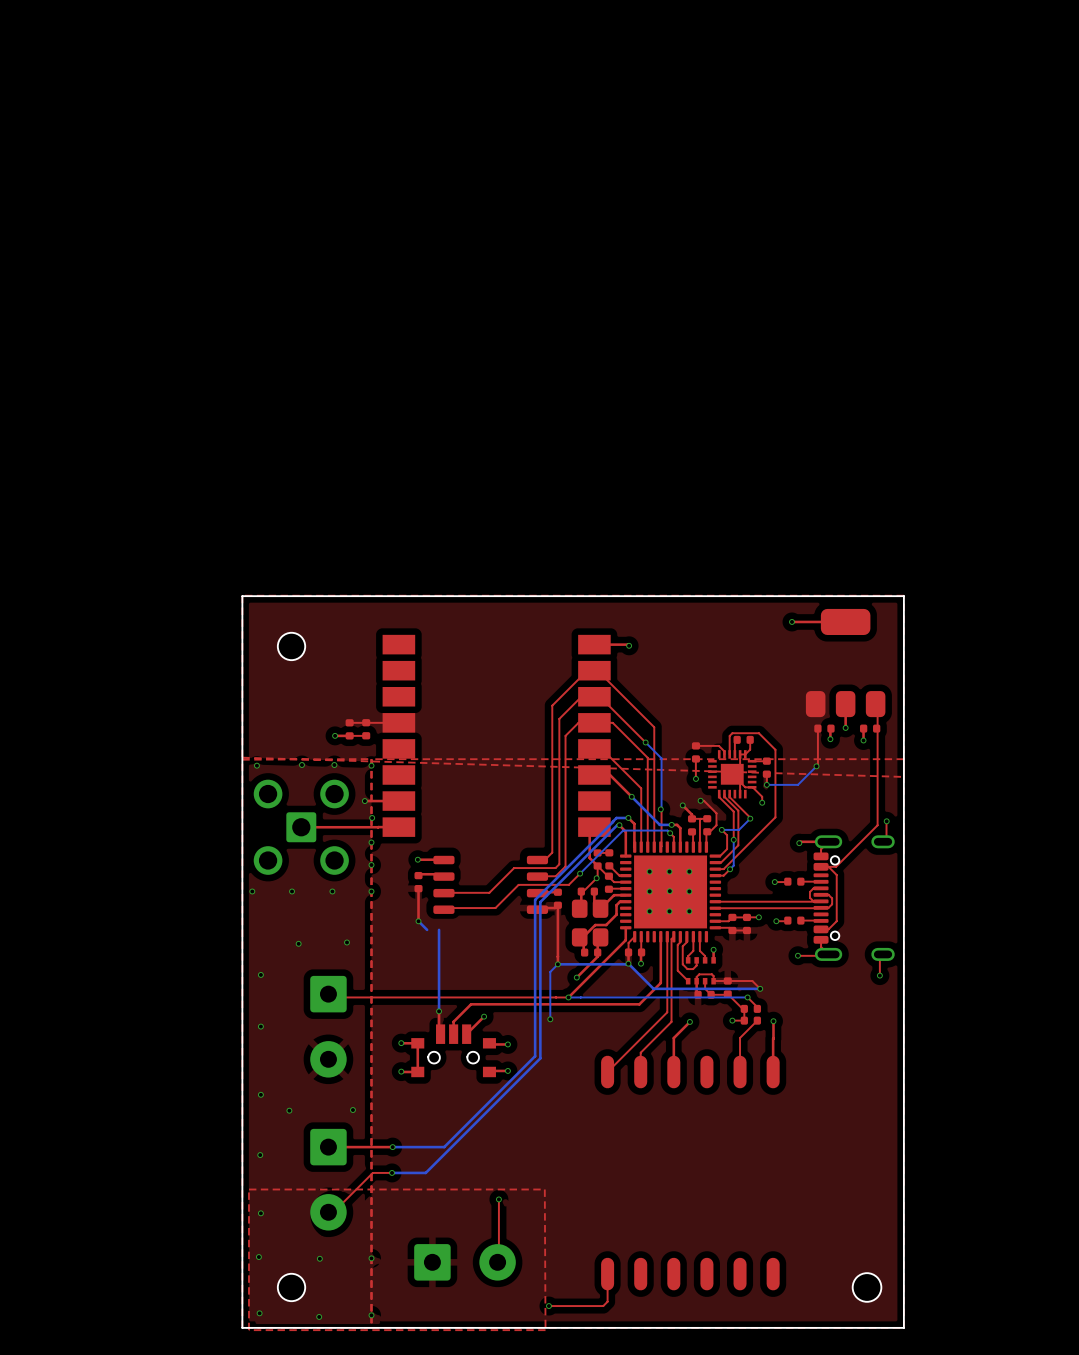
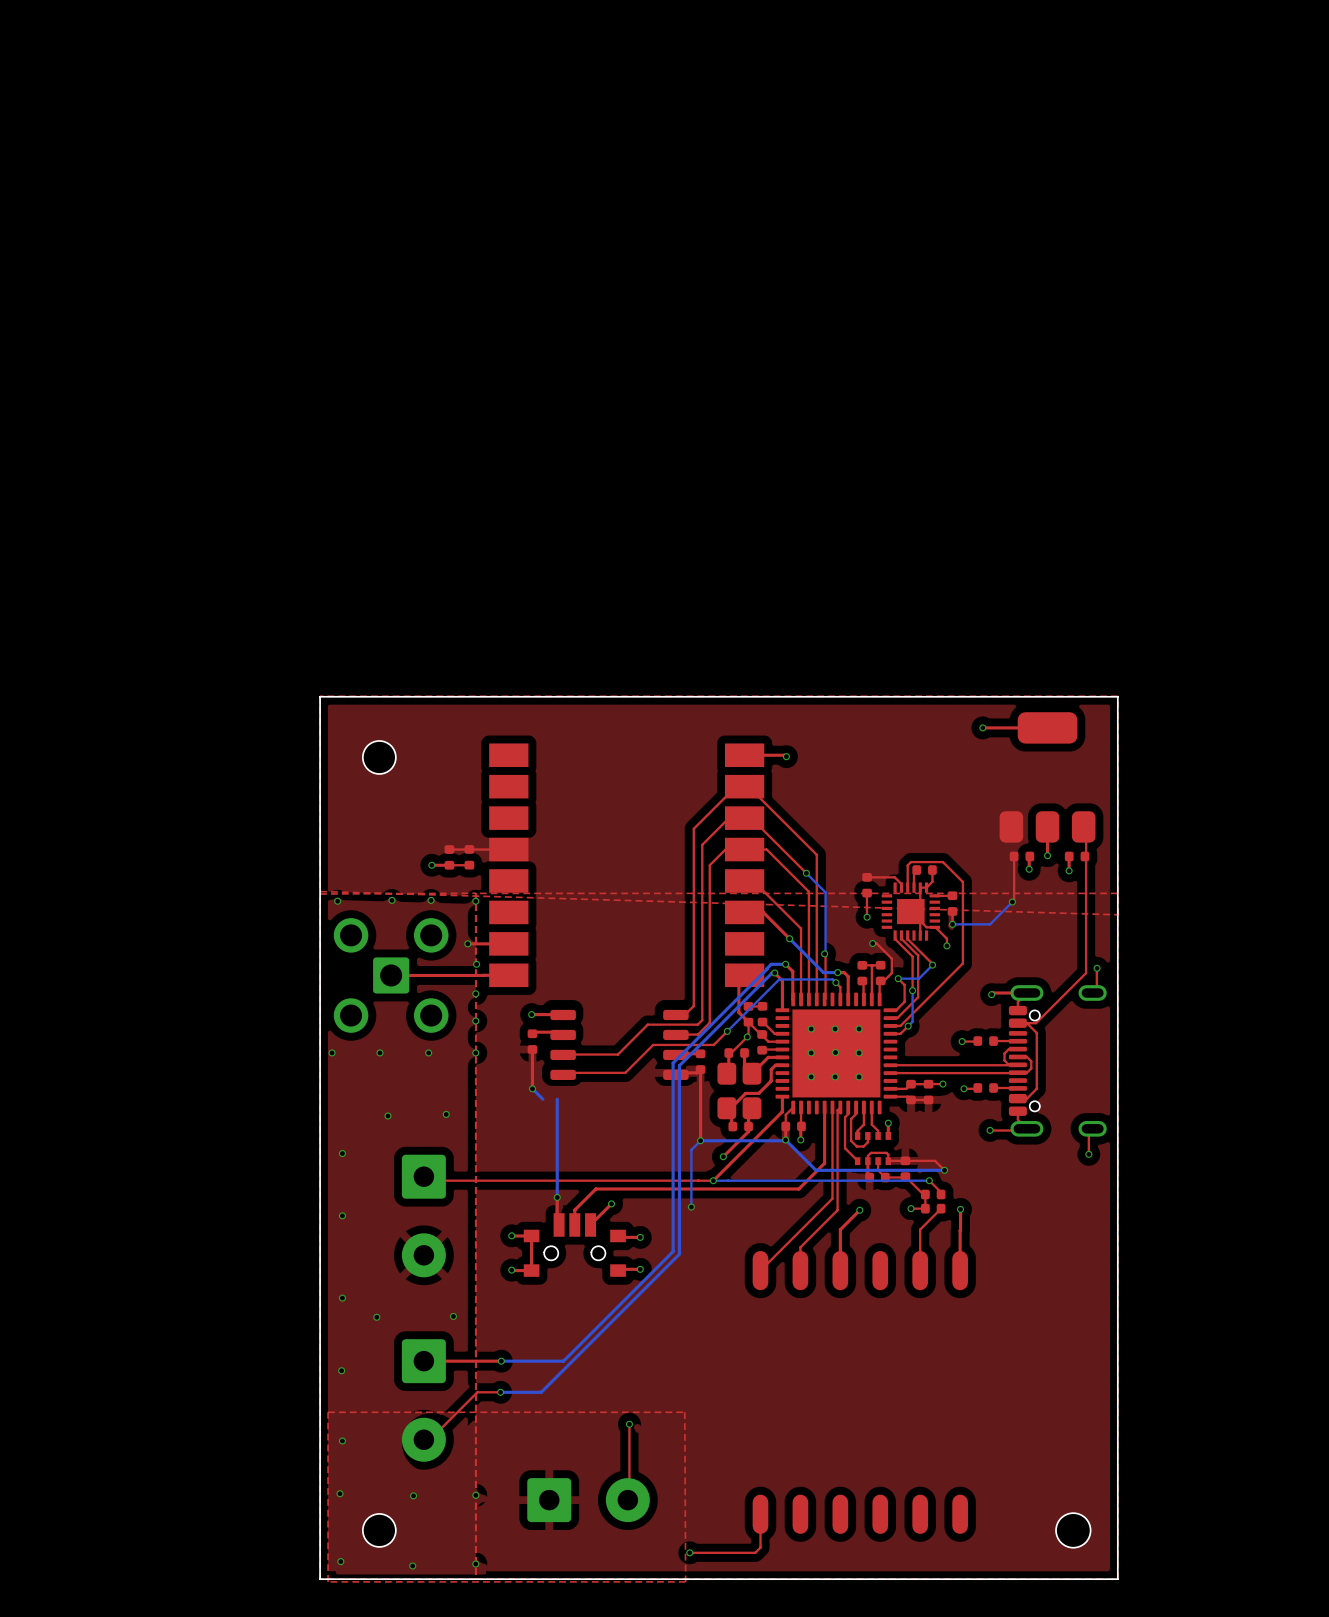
top track: (682, 805) (692, 814) (692, 818) -> none
via: (682, 805) -> none

